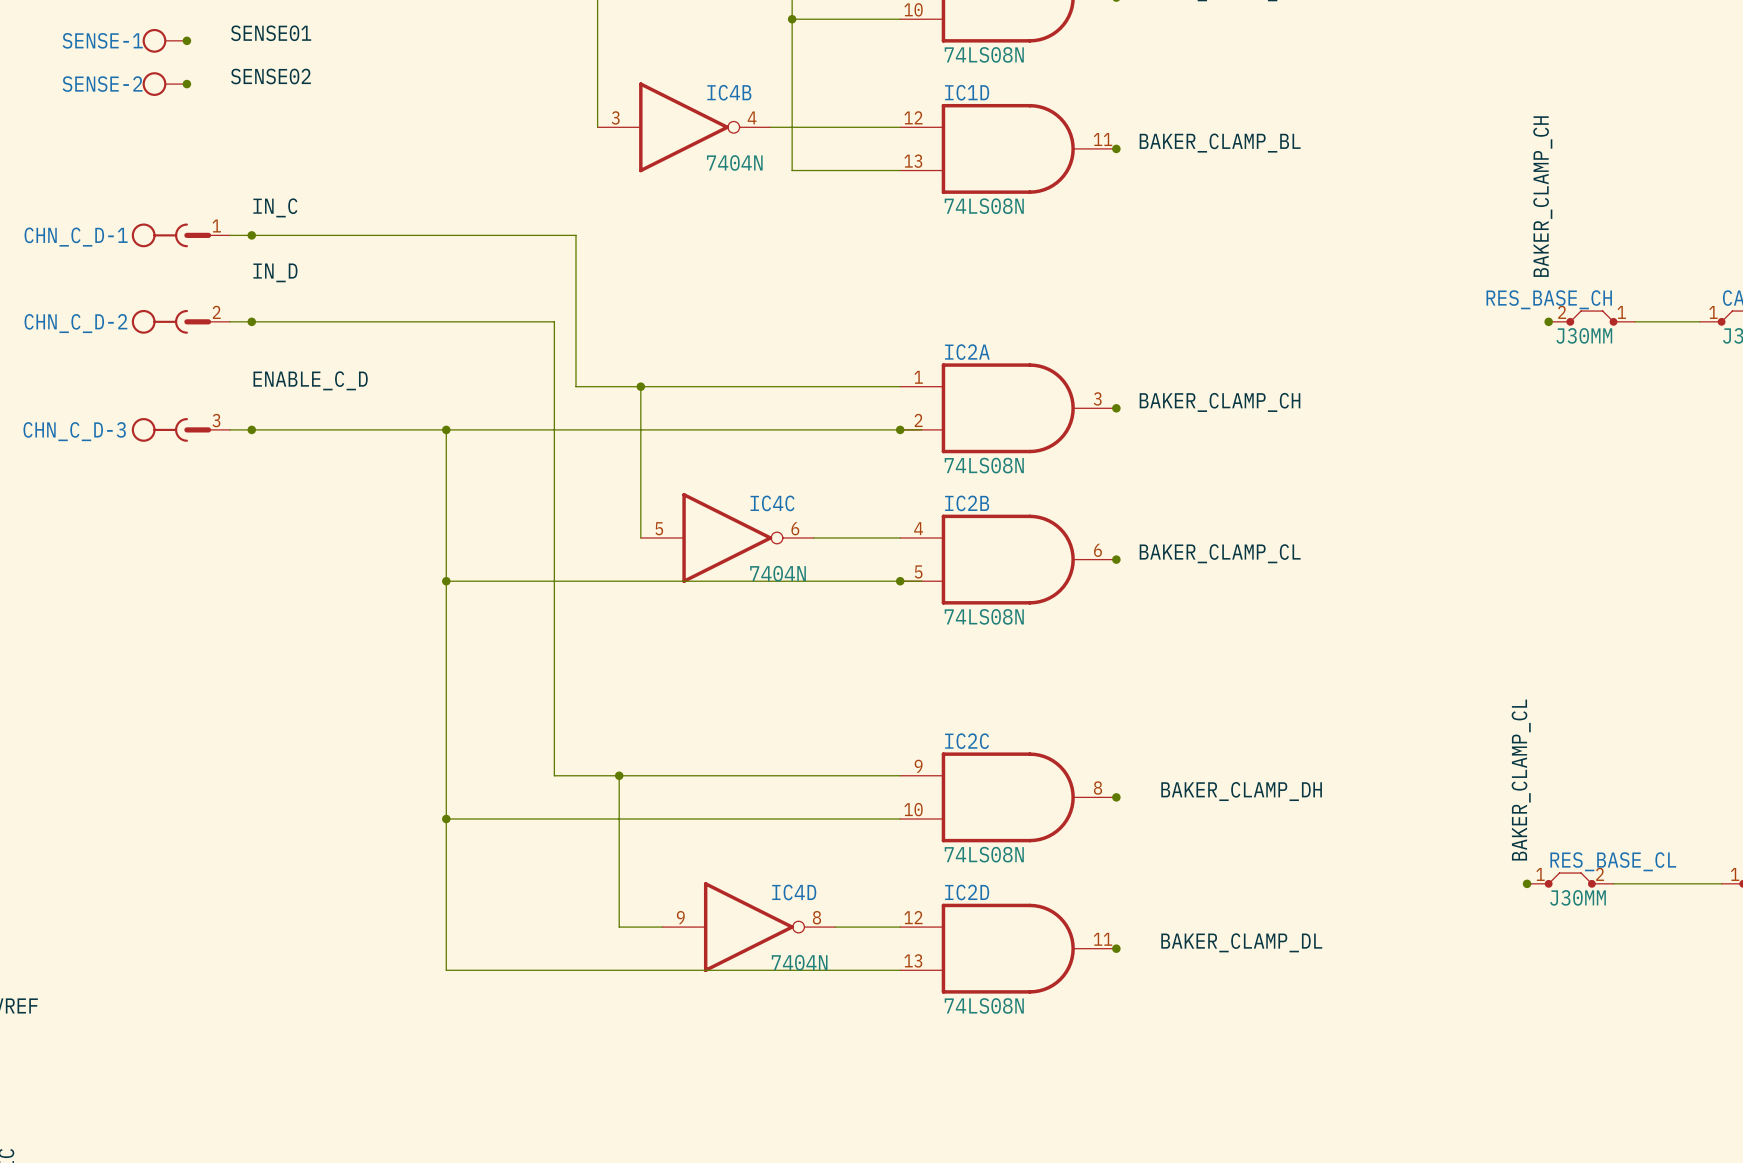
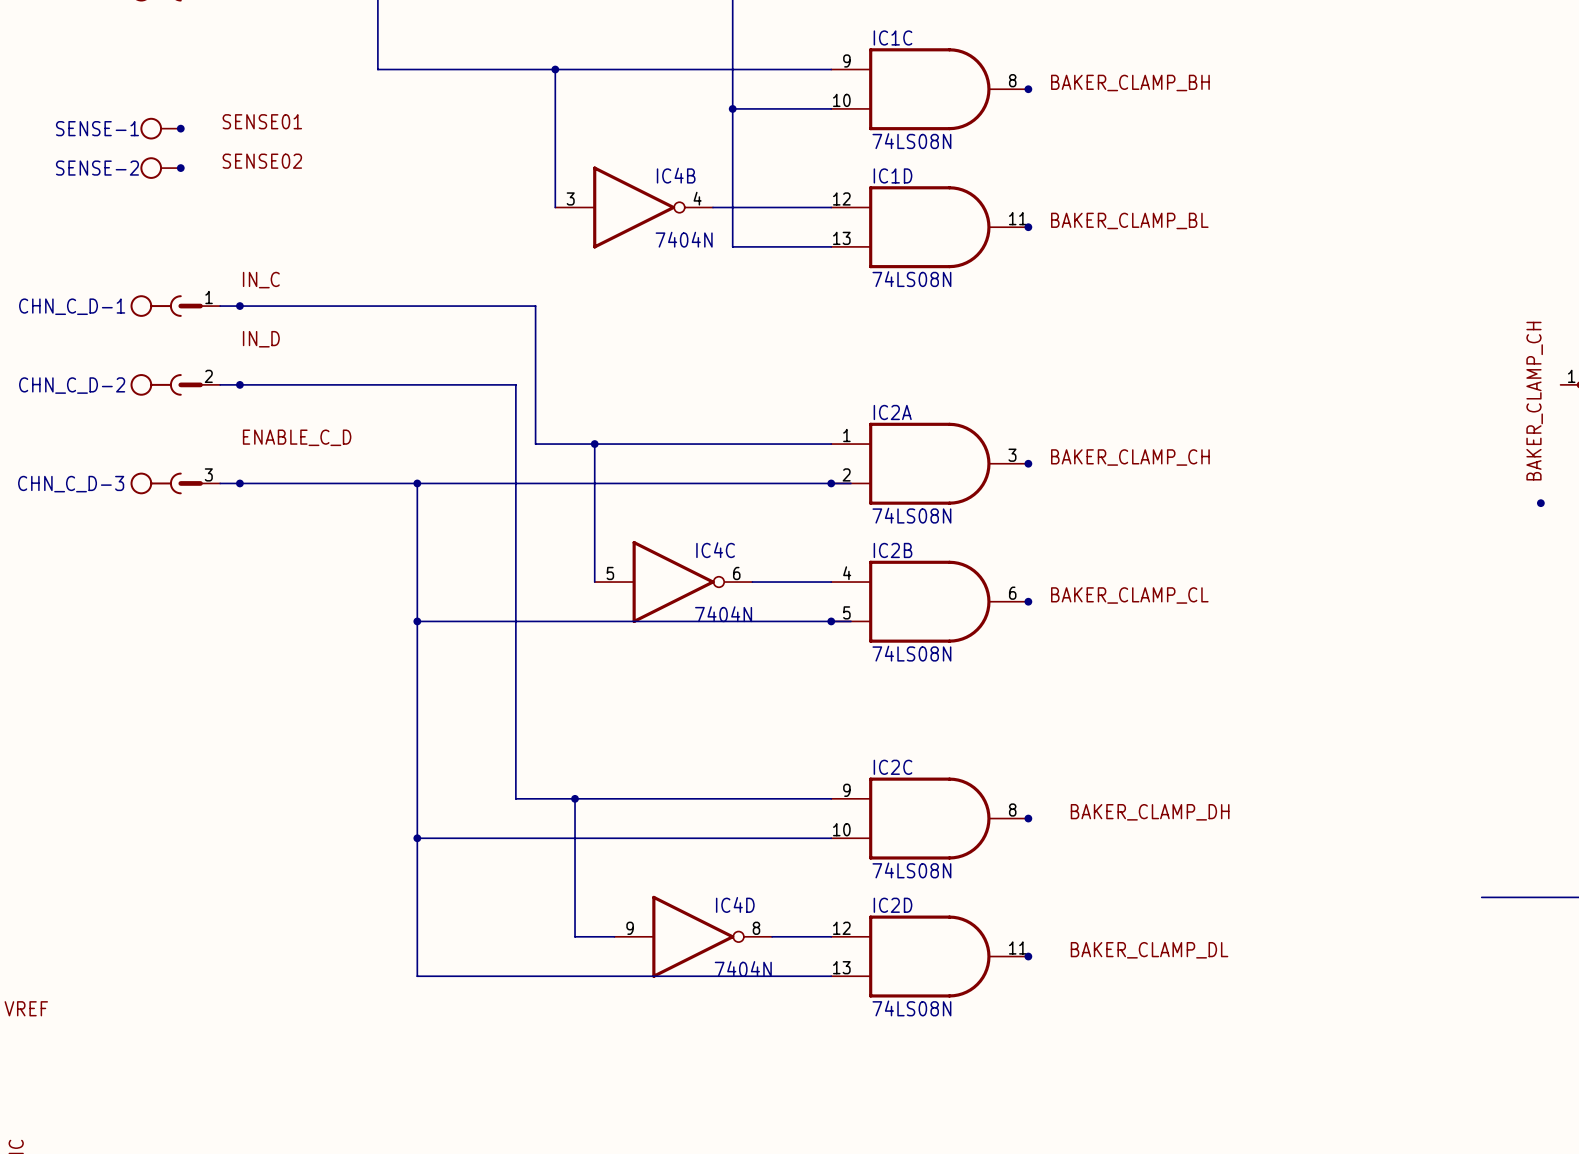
label position: BAKER_CLAMP_CH (1542, 196) -> BAKER_CLAMP_CH (1534, 401)
RES_BASE_CH: J30MM (1591, 318) -> none
junction: (1548, 321) -> none
wire: (1635, 321) (1699, 321) -> none
junction: none -> (1540, 503)
label: BAKER_CLAMP_CL (1521, 780) -> none
RES_BASE_CL: J30MM (1570, 880) -> none
junction: (1527, 883) -> none

